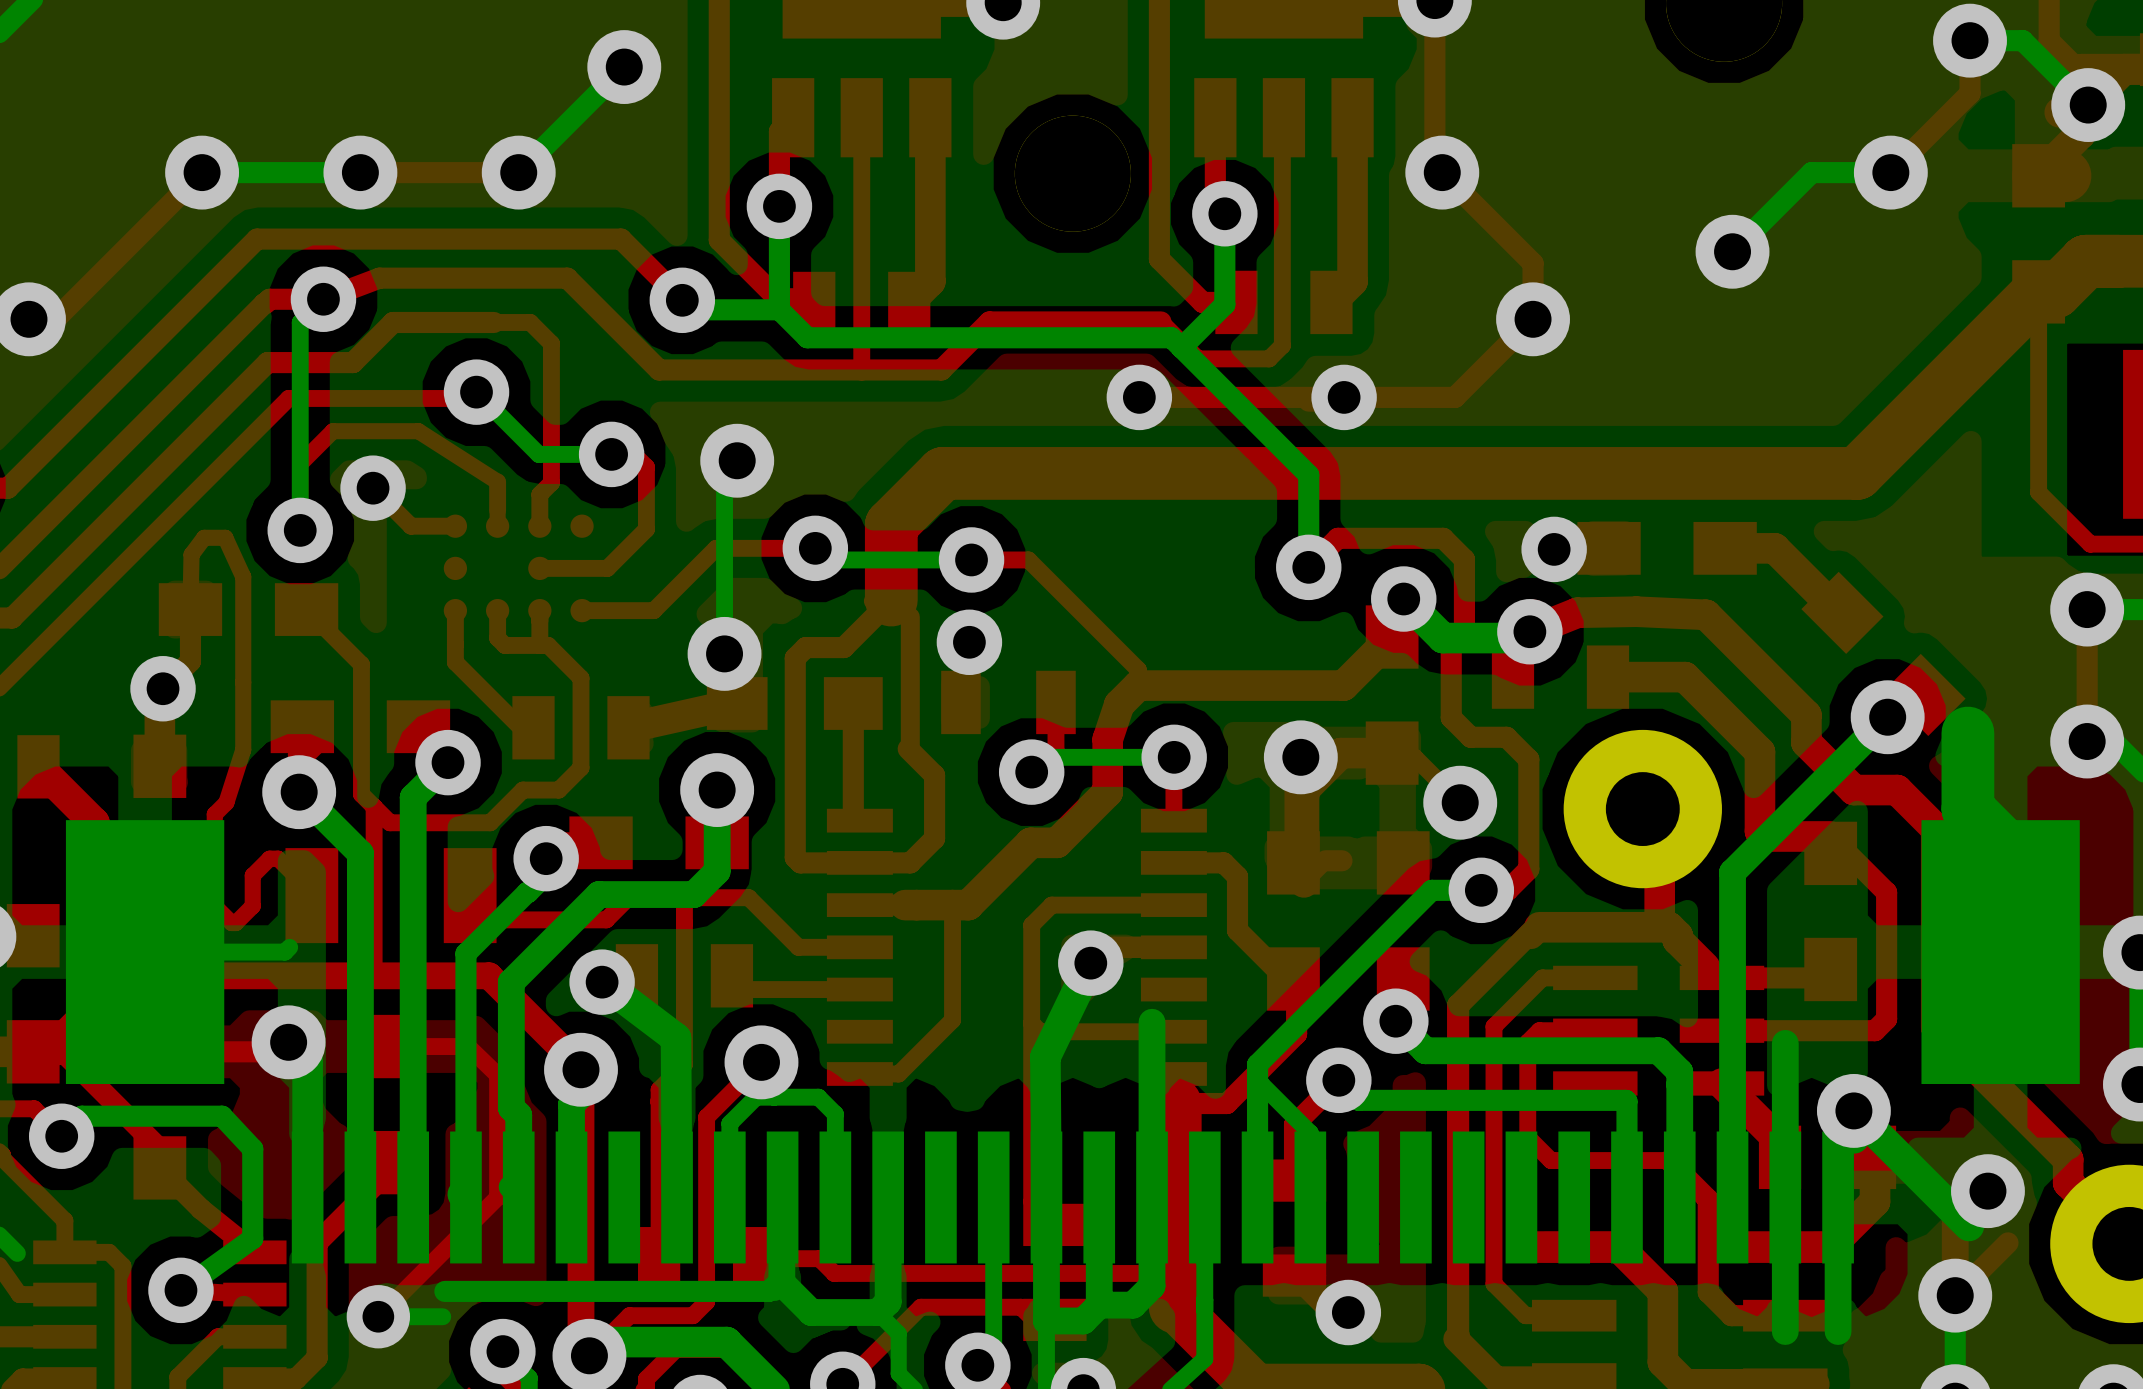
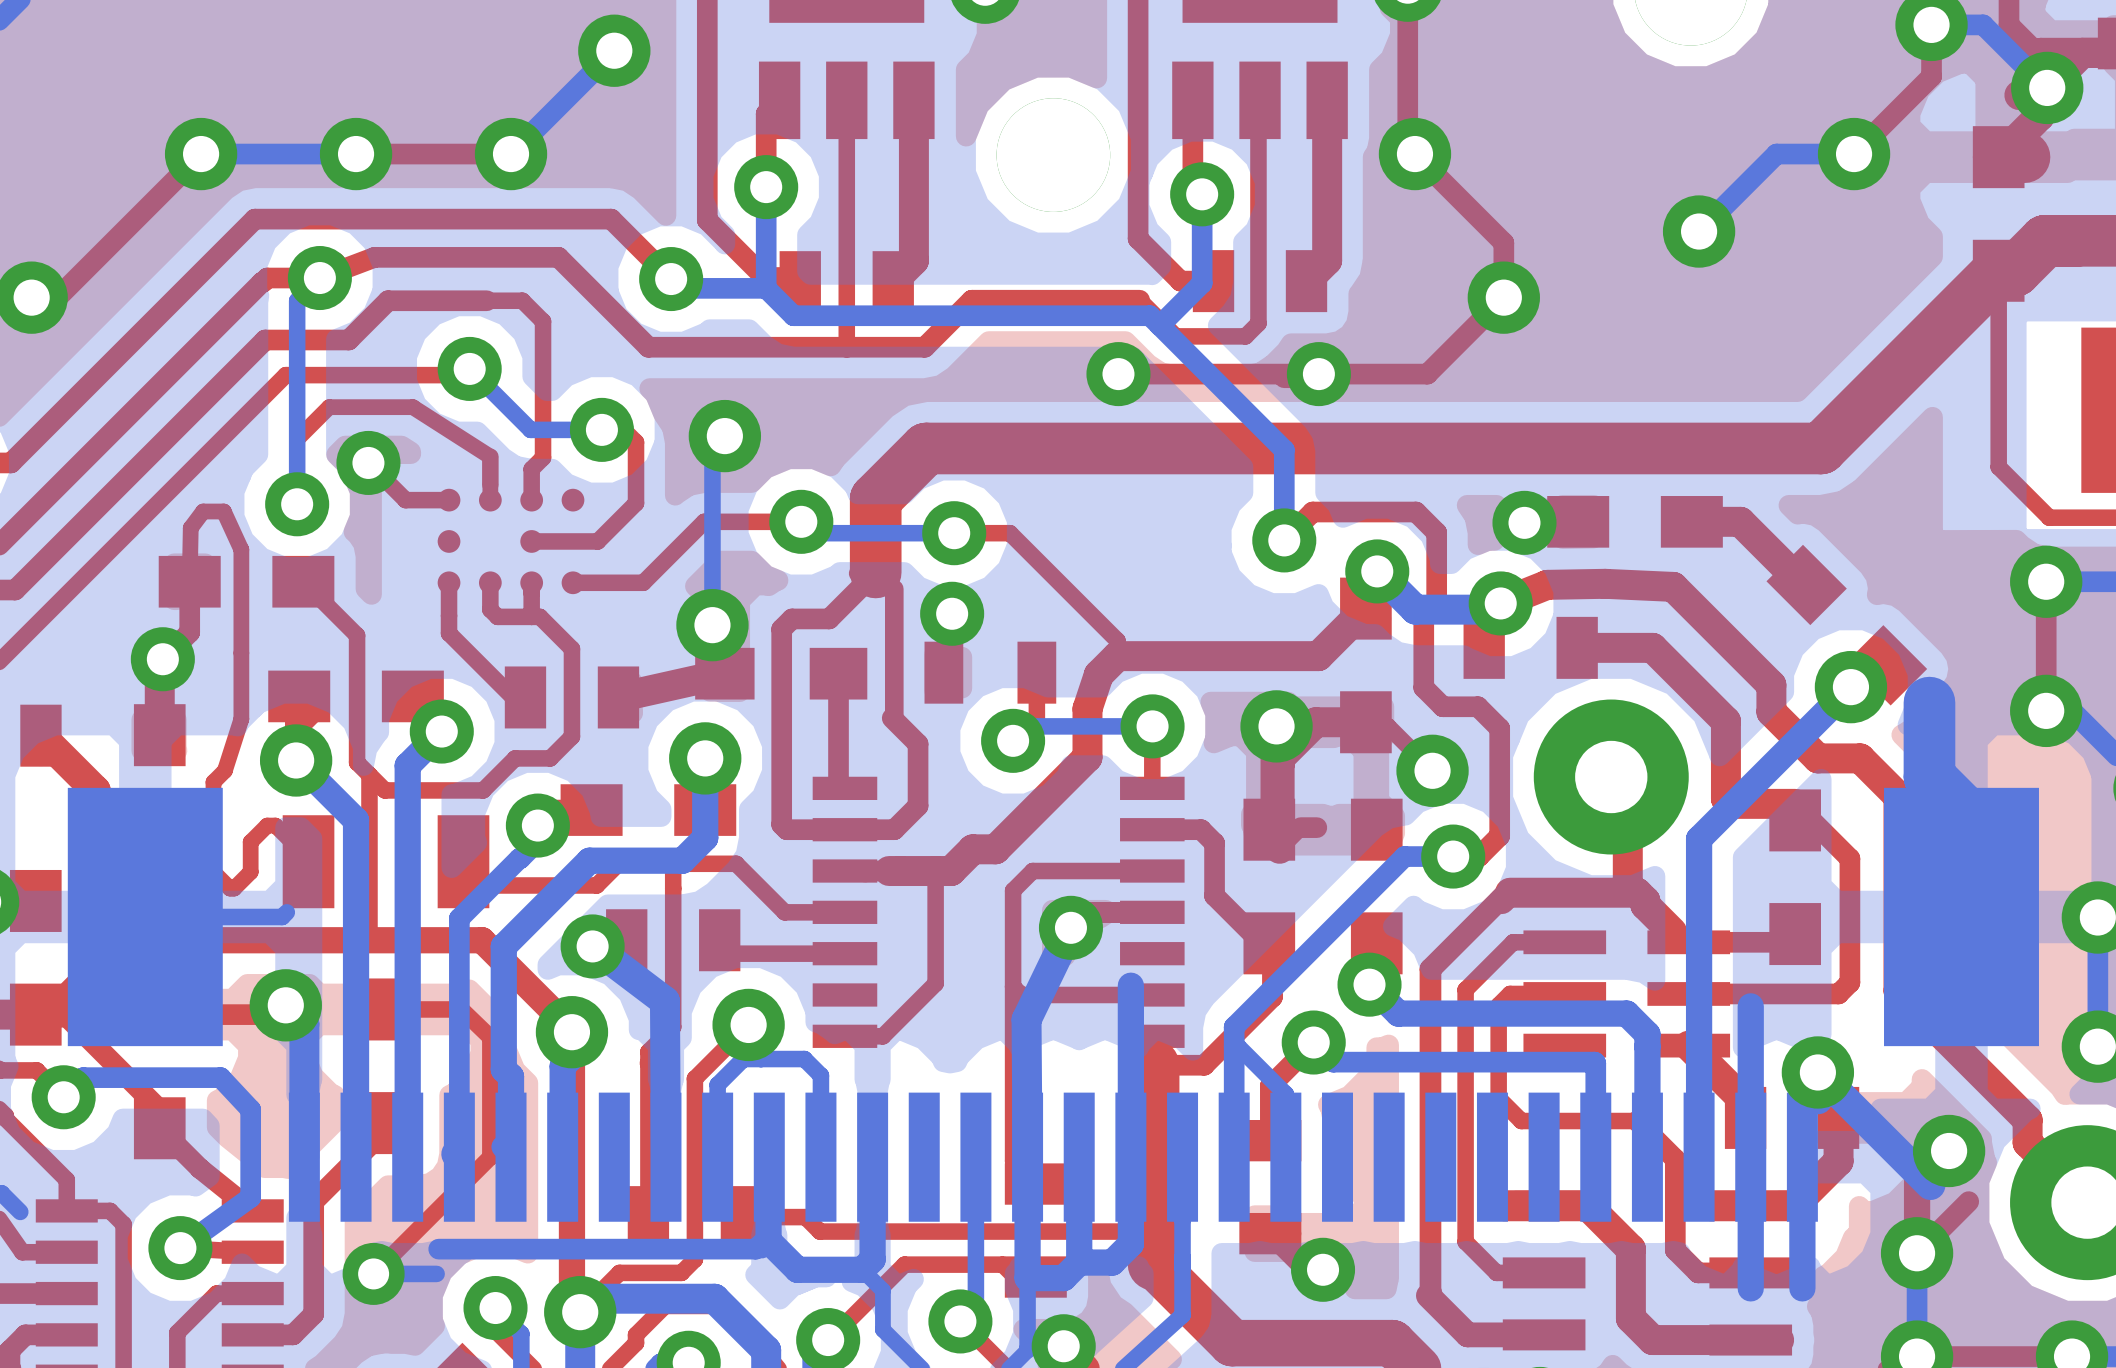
top track: (1107, 789) (1107, 792) (1057, 842) (1030, 842) (990, 882) -> (1087, 757) (995, 849) (972, 849)

